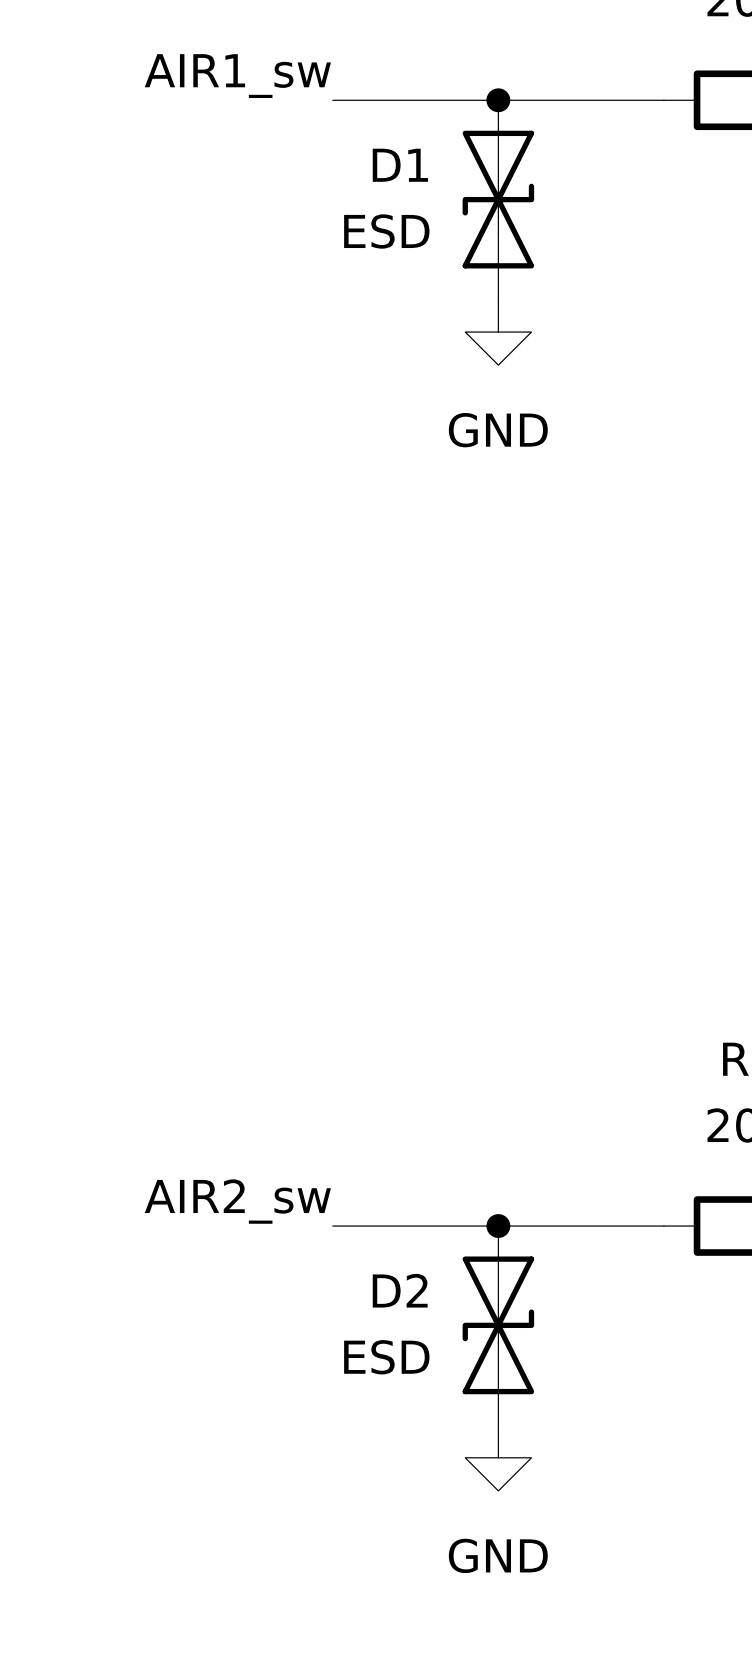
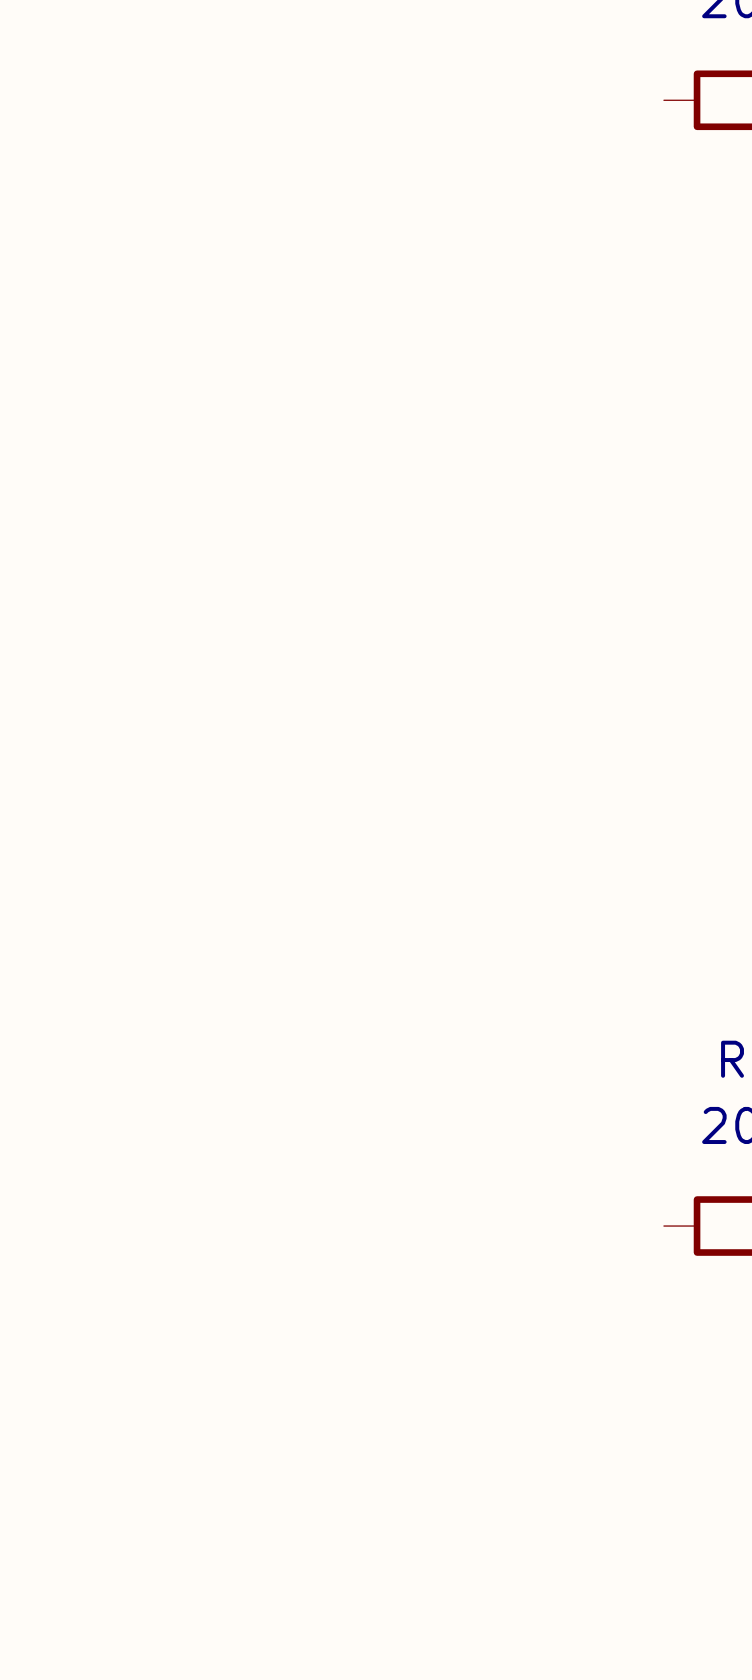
label: AIR1_sw (237, 76) -> none
wire: (332, 100) (663, 100) -> none
junction: (498, 100) -> none
D1: ESD (498, 199) -> none
power symbol: GND (498, 332) -> none
label: AIR2_sw (237, 1201) -> none
wire: (332, 1226) (663, 1226) -> none
junction: (498, 1226) -> none
D2: ESD (498, 1325) -> none
power symbol: GND (498, 1457) -> none

